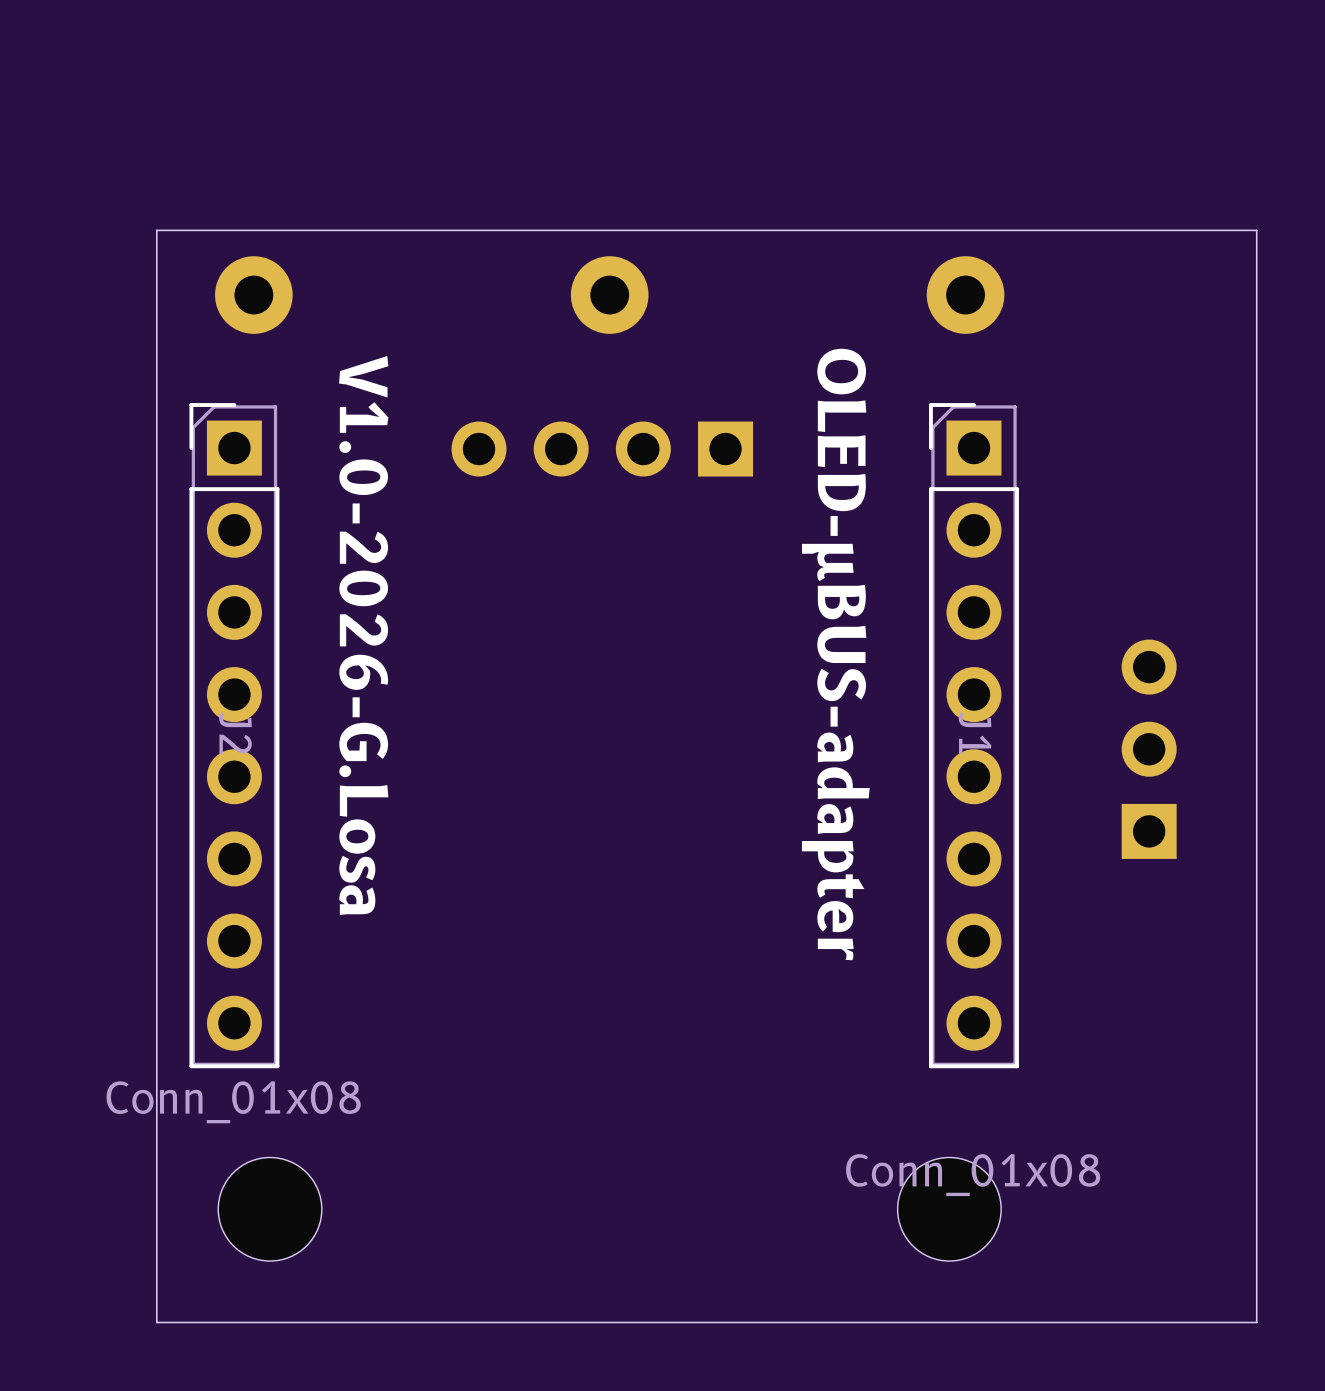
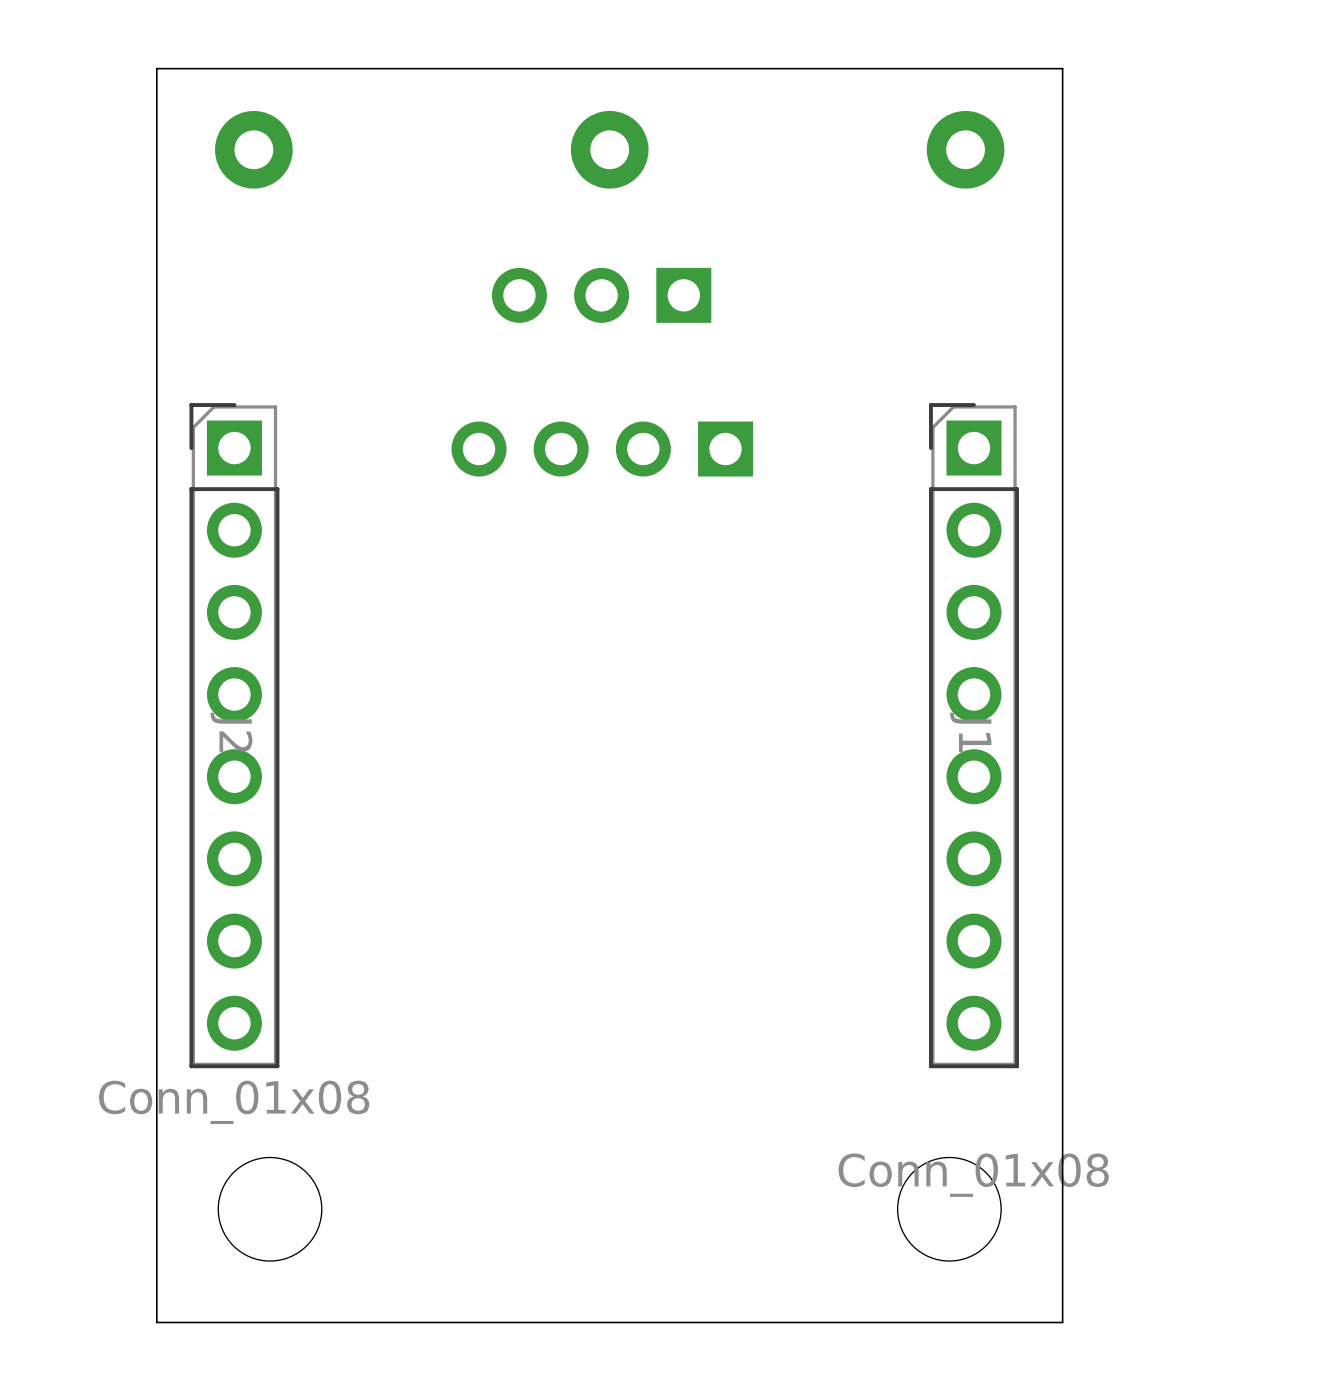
part: none -> (609, 149)
board edge: (156, 230) (1256, 230) (1256, 1322) (1062, 1322) -> (156, 230) (156, 68) (1062, 68) (1062, 1322)
part footprint: [570, 256, 649, 334] -> [491, 267, 712, 323]
part position: (253, 295) -> (253, 149)
part position: (965, 295) -> (965, 149)
text: V1.0-2026-G.Losa (363, 635) -> none
text: OLED-µBUS-adapter (835, 654) -> none
part: (1149, 749) -> none

